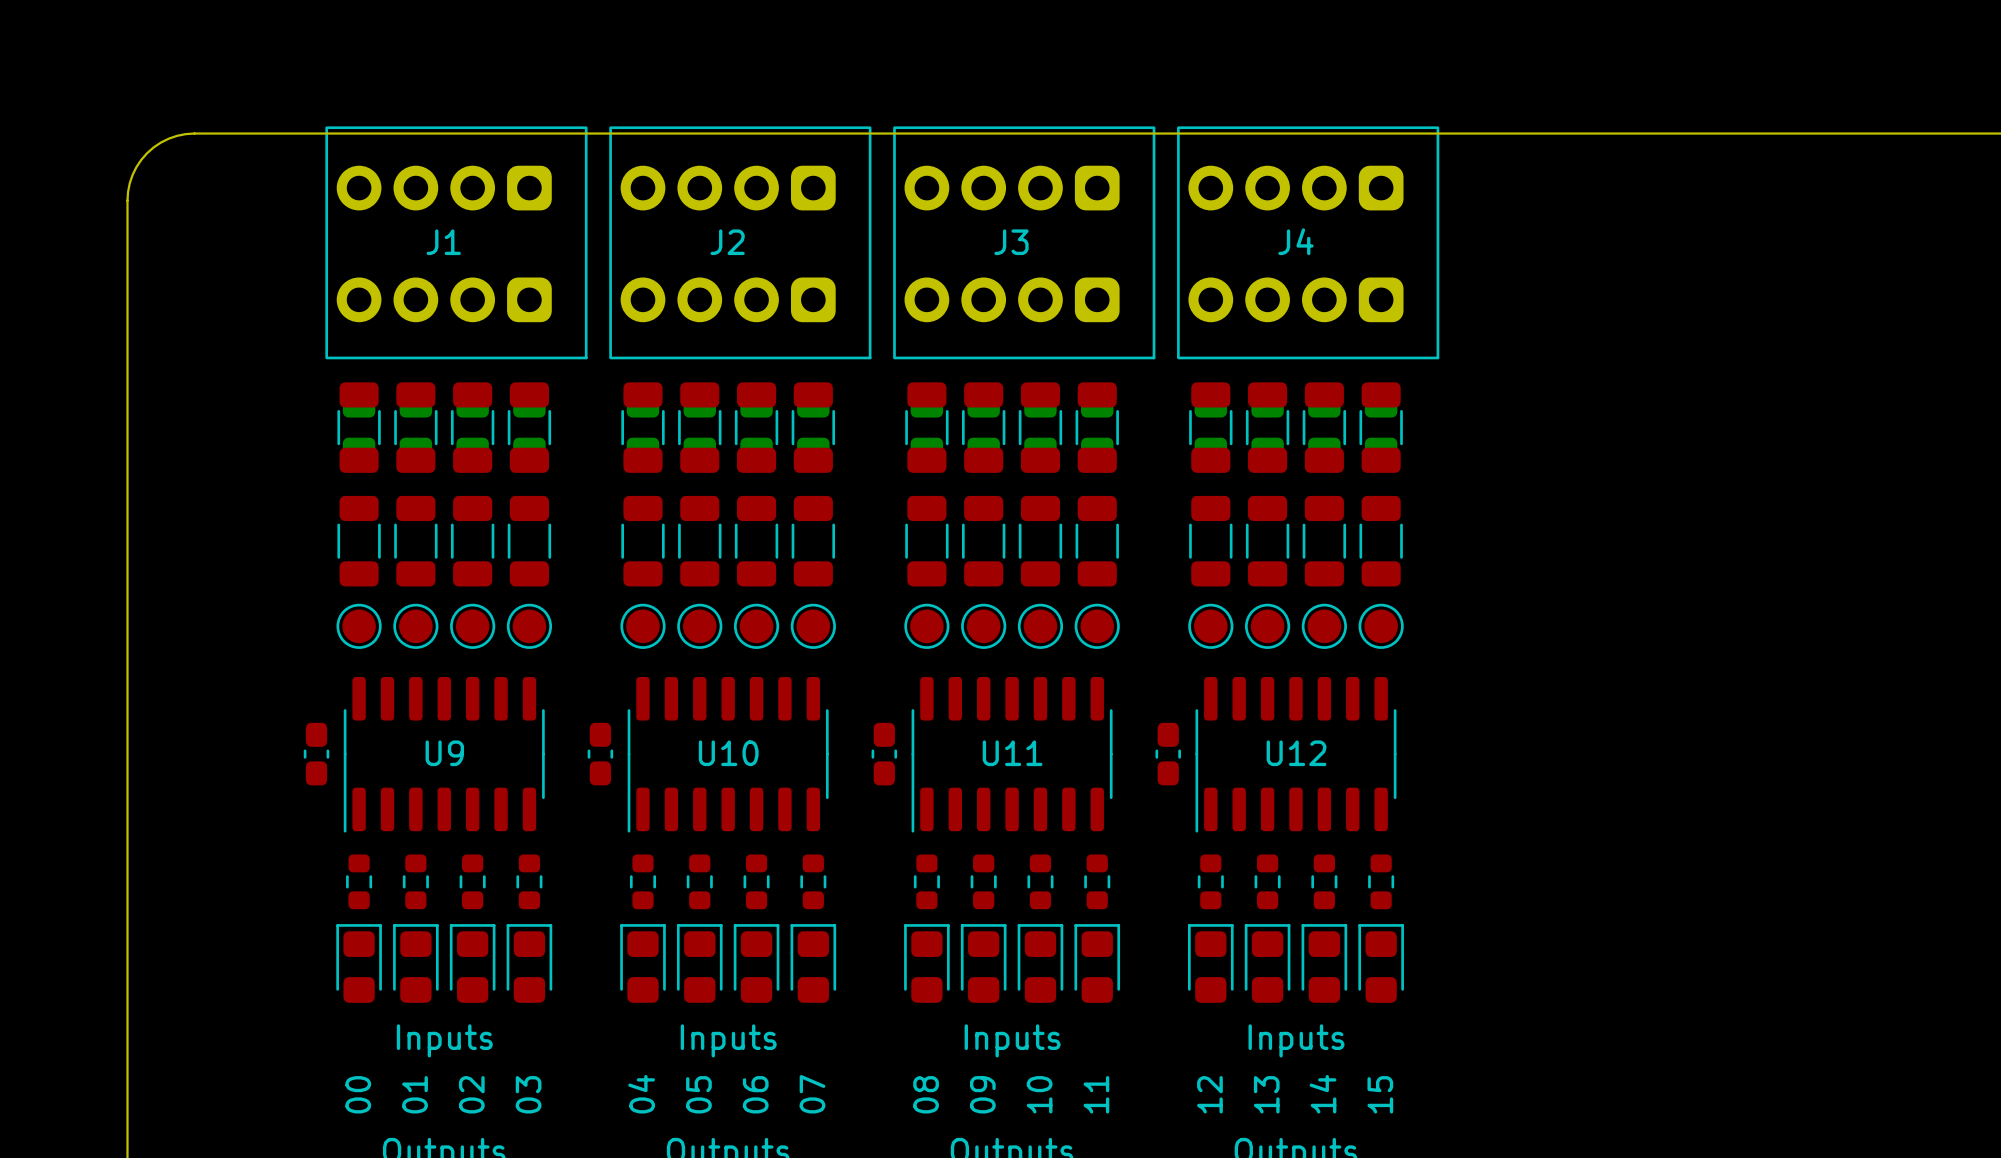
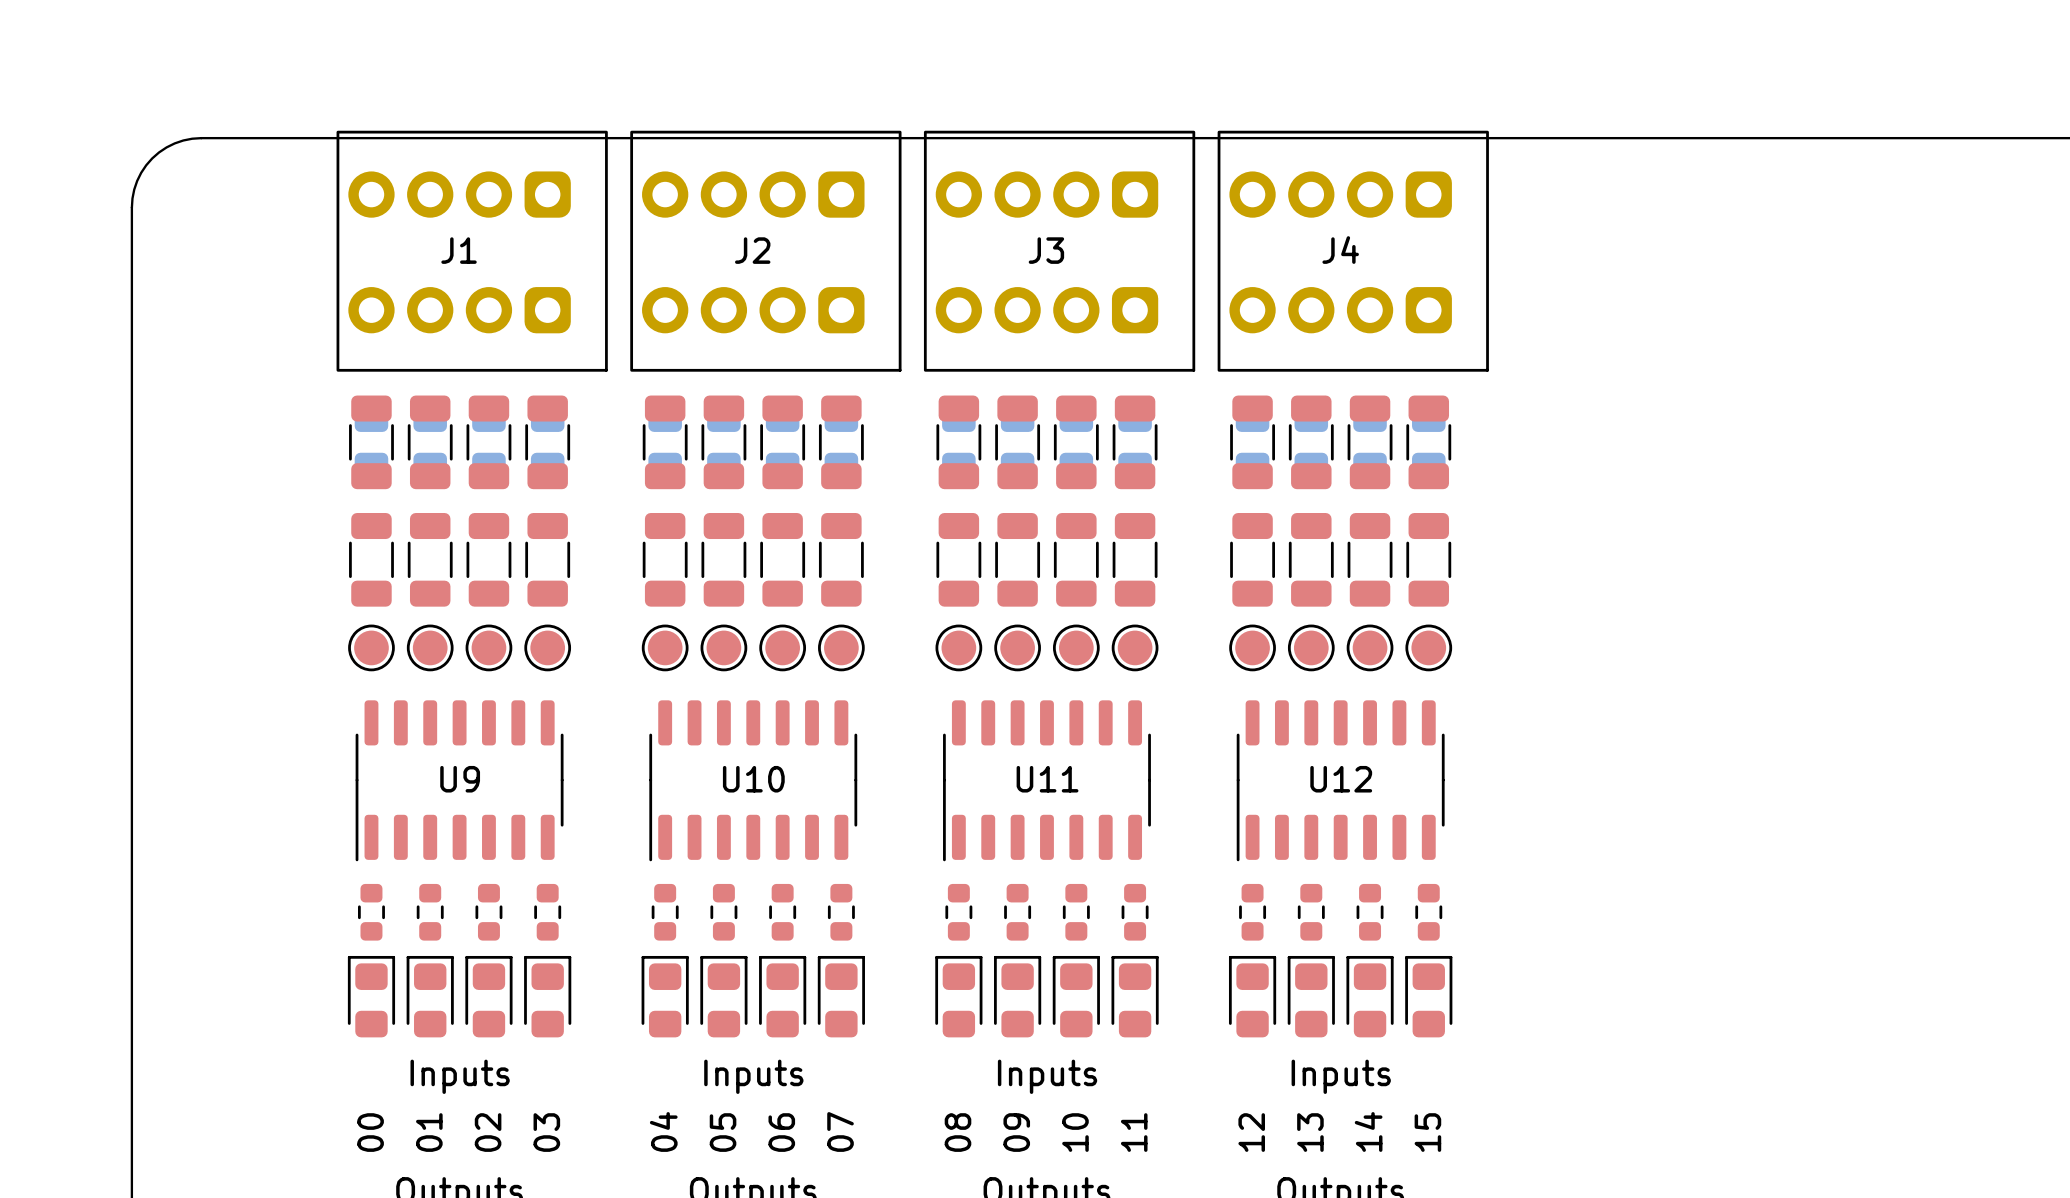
part: (316, 754) -> none
part: (600, 754) -> none
part: (884, 754) -> none
part: (1168, 754) -> none

